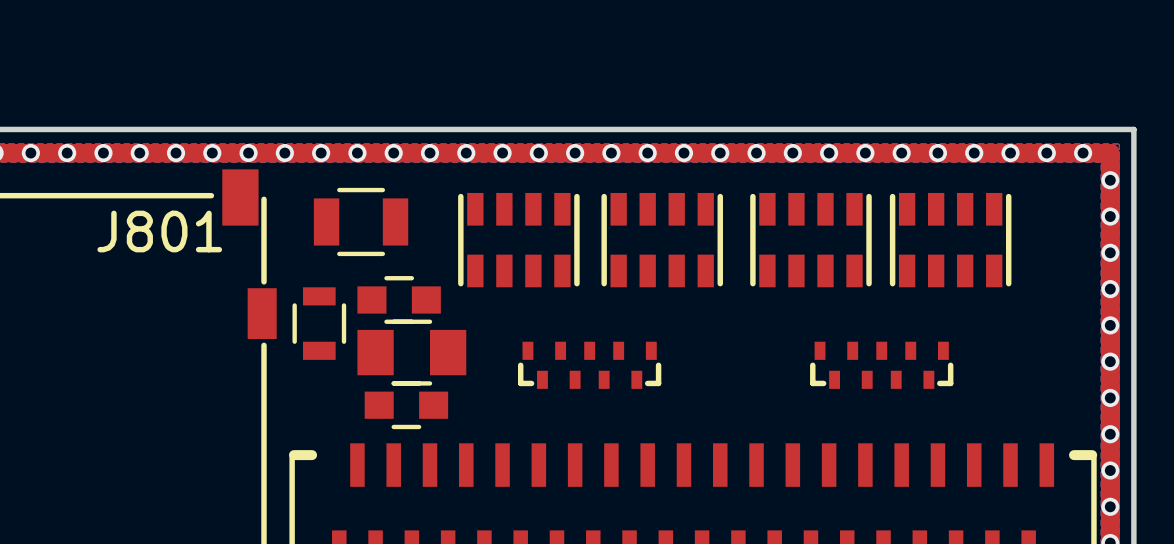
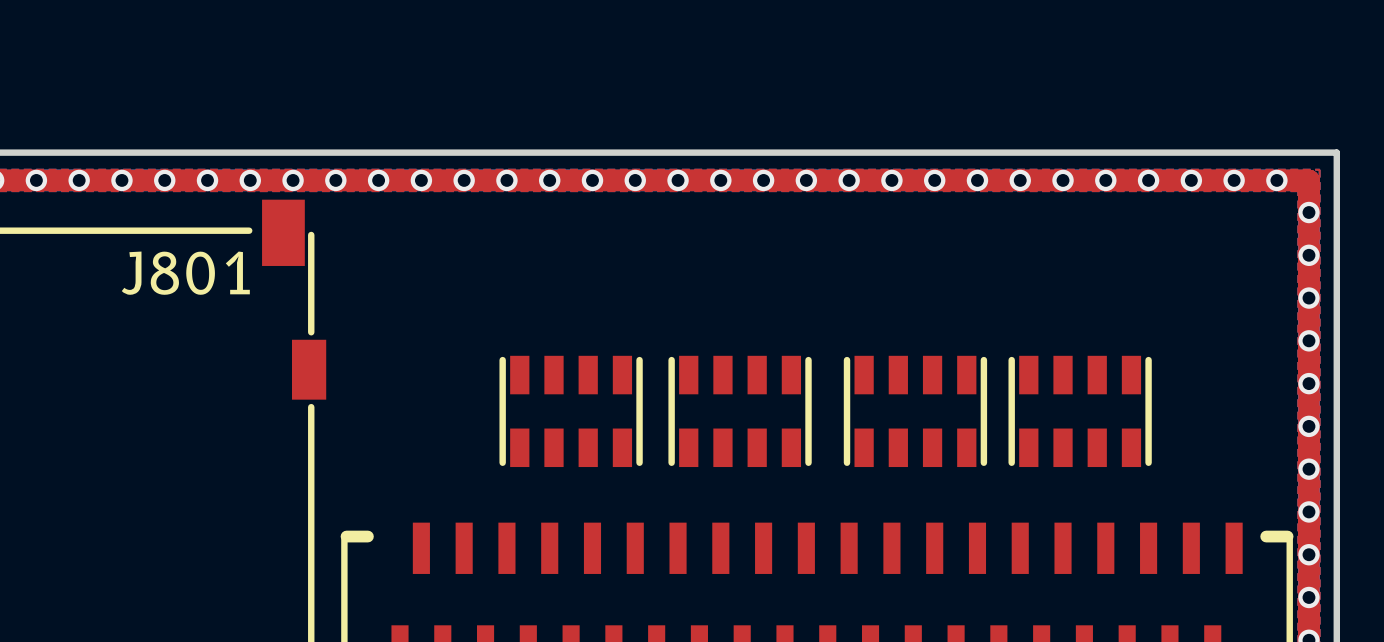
part: (361, 221) -> none
part: (518, 240) -> none
part: (662, 240) -> none
part: (810, 240) -> none
part: (950, 240) -> none
part: (399, 299) -> none
part: (319, 323) -> none
part: none -> (571, 411)
part: none -> (740, 411)
part: none -> (915, 411)
part: none -> (1080, 411)
part: (411, 352) -> none
part: (589, 365) -> none
part: (881, 365) -> none
part: (406, 405) -> none

